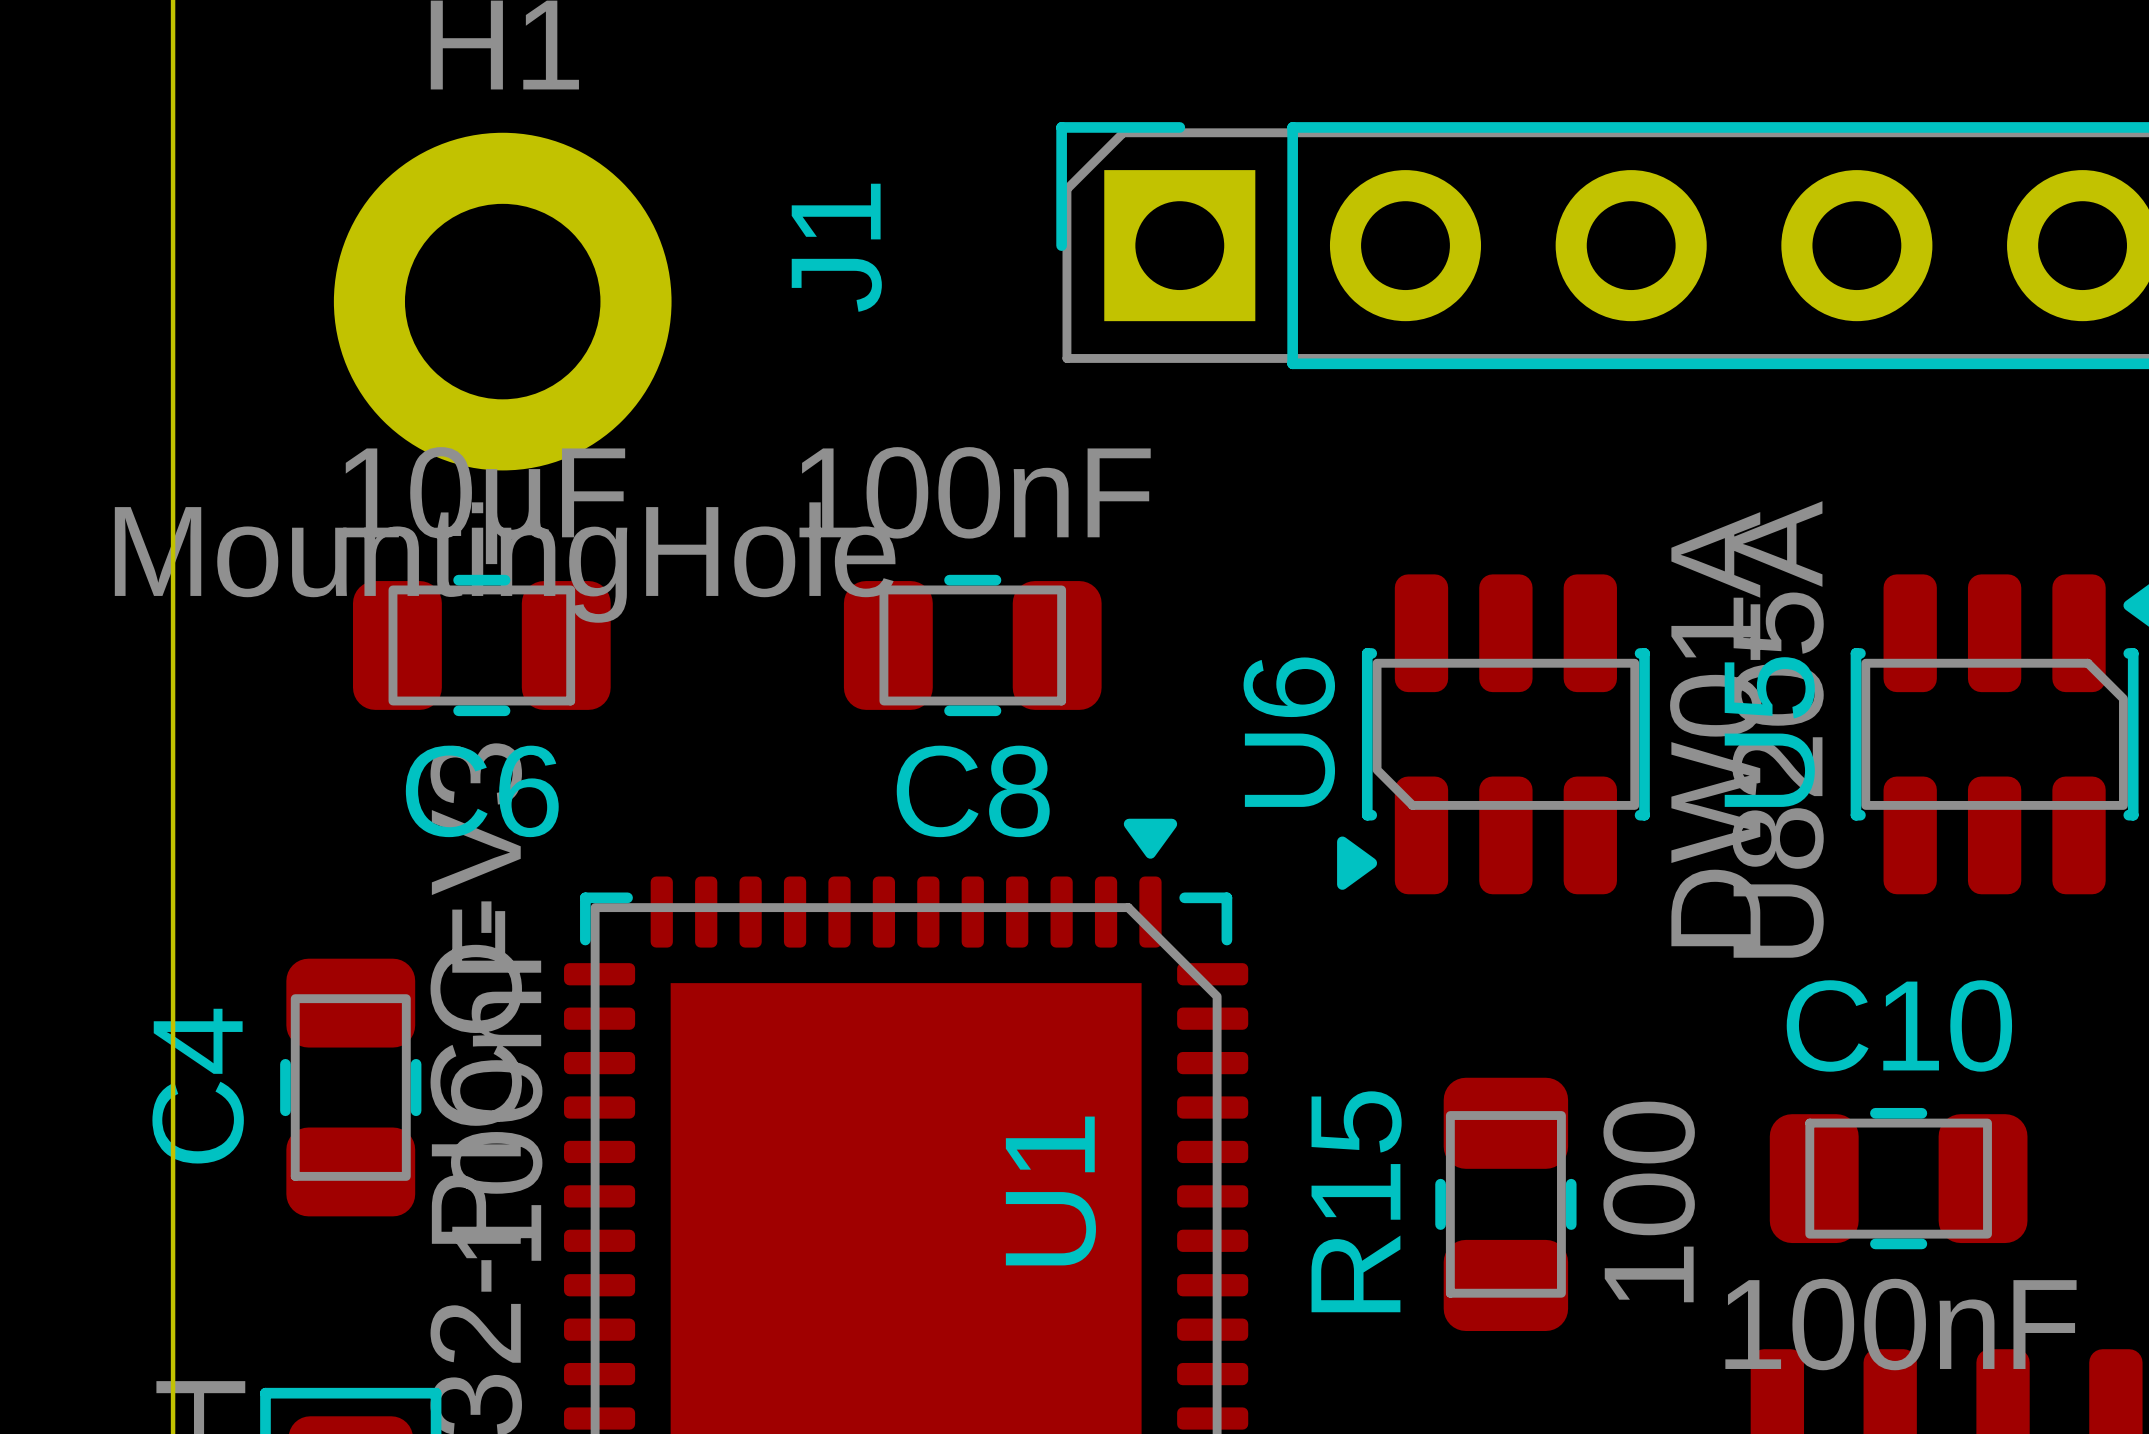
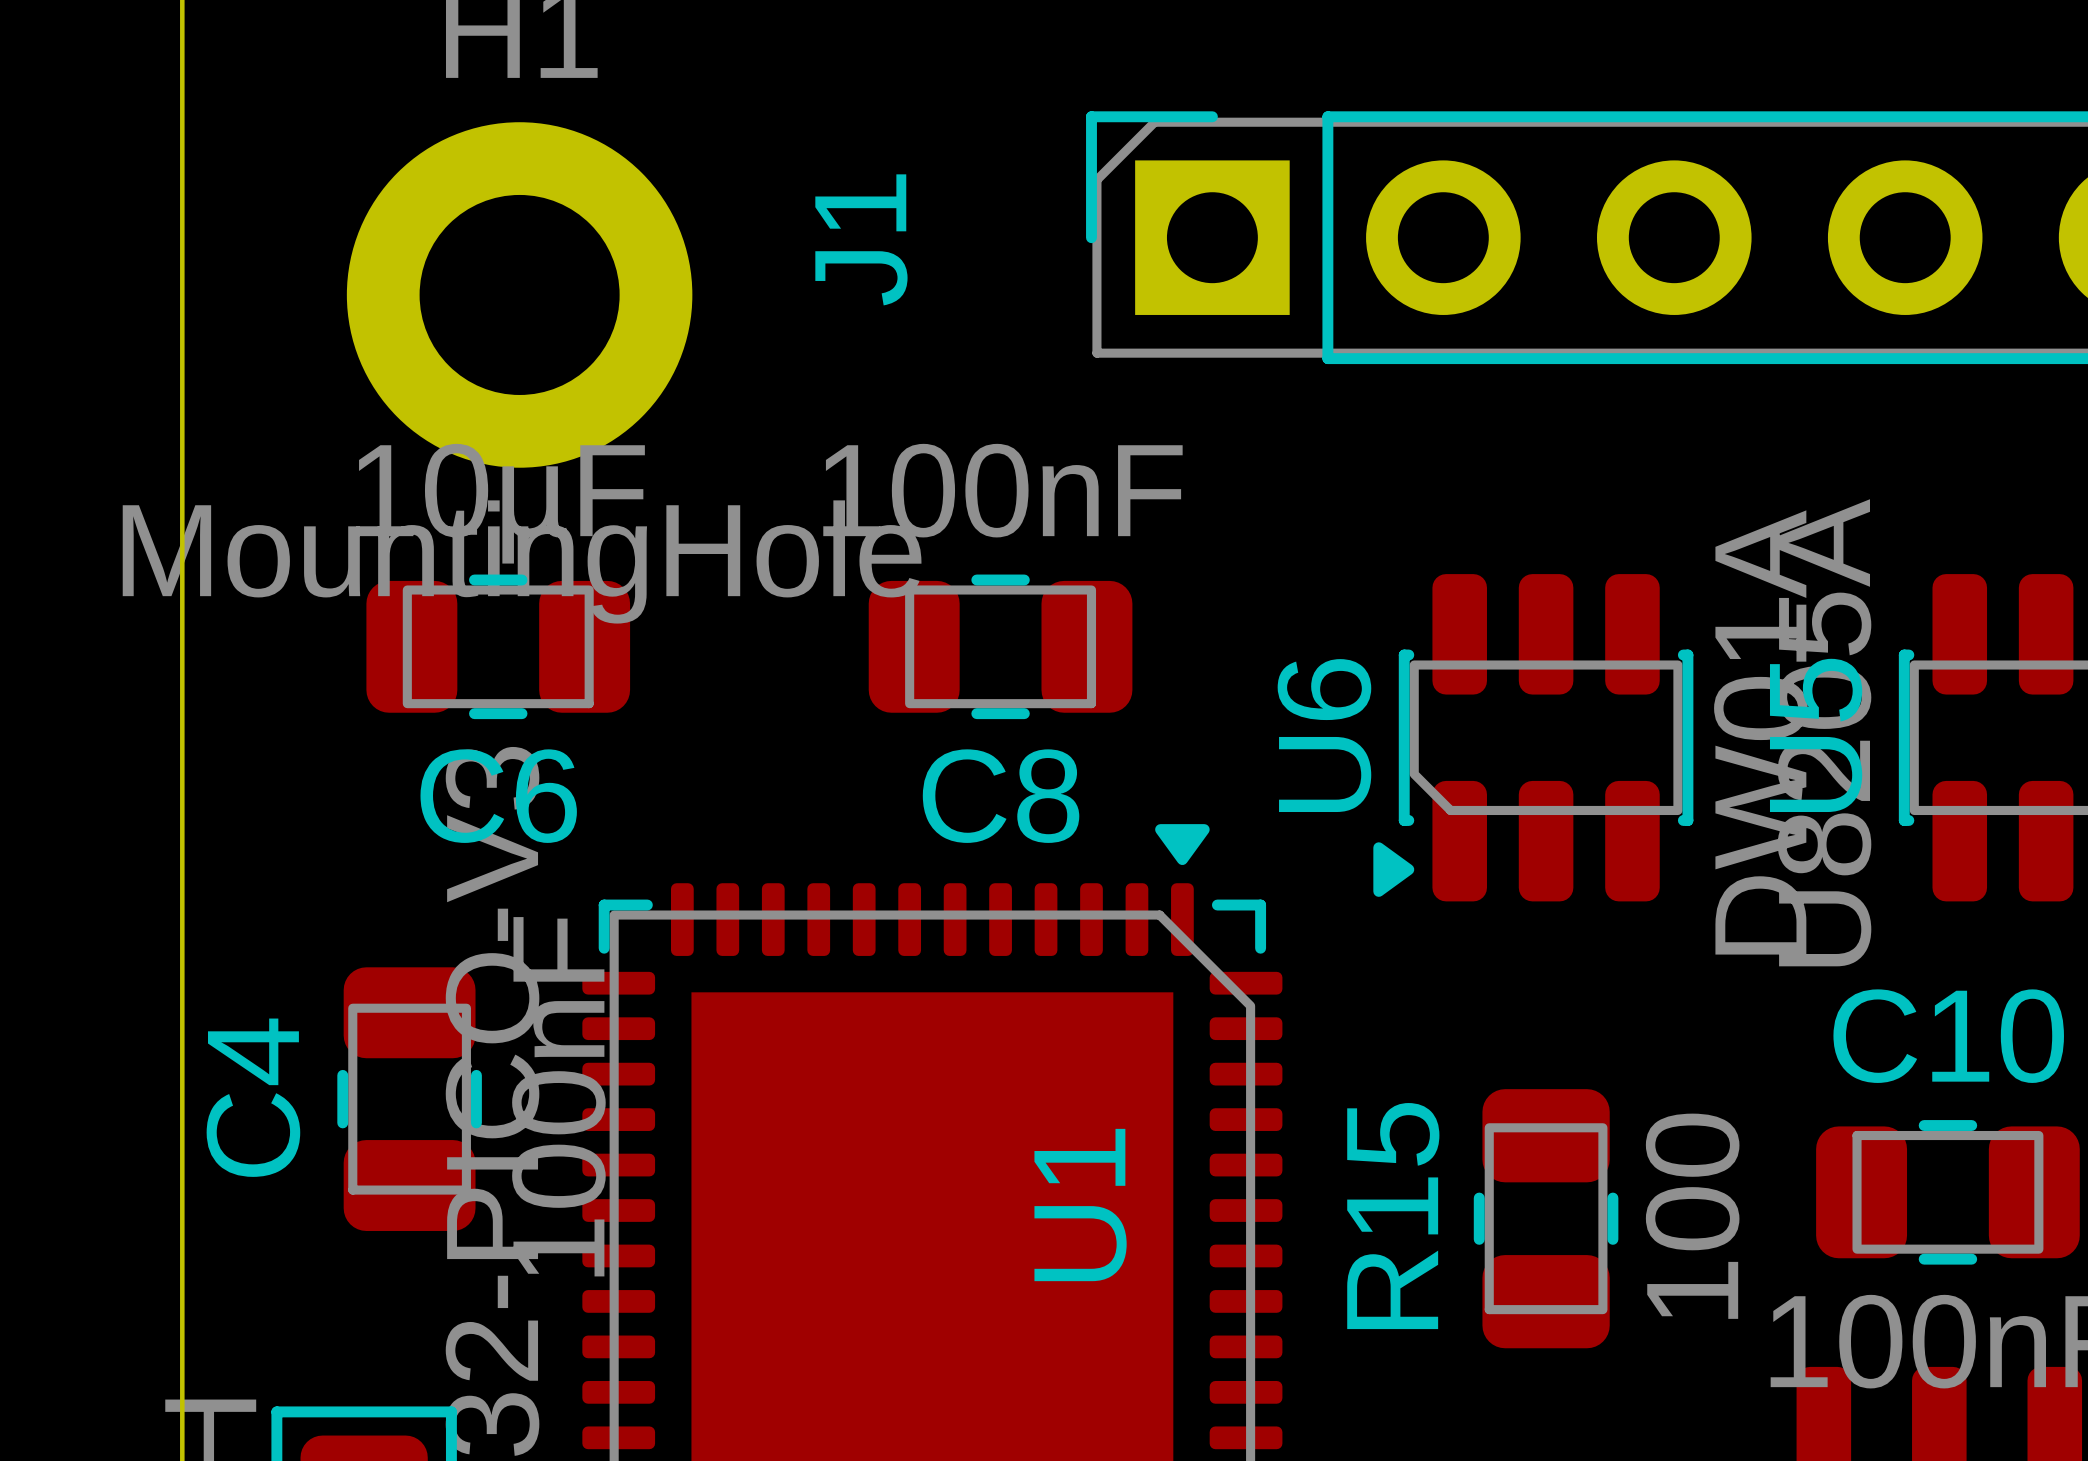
C4 position: (350, 1087) -> (409, 1099)

